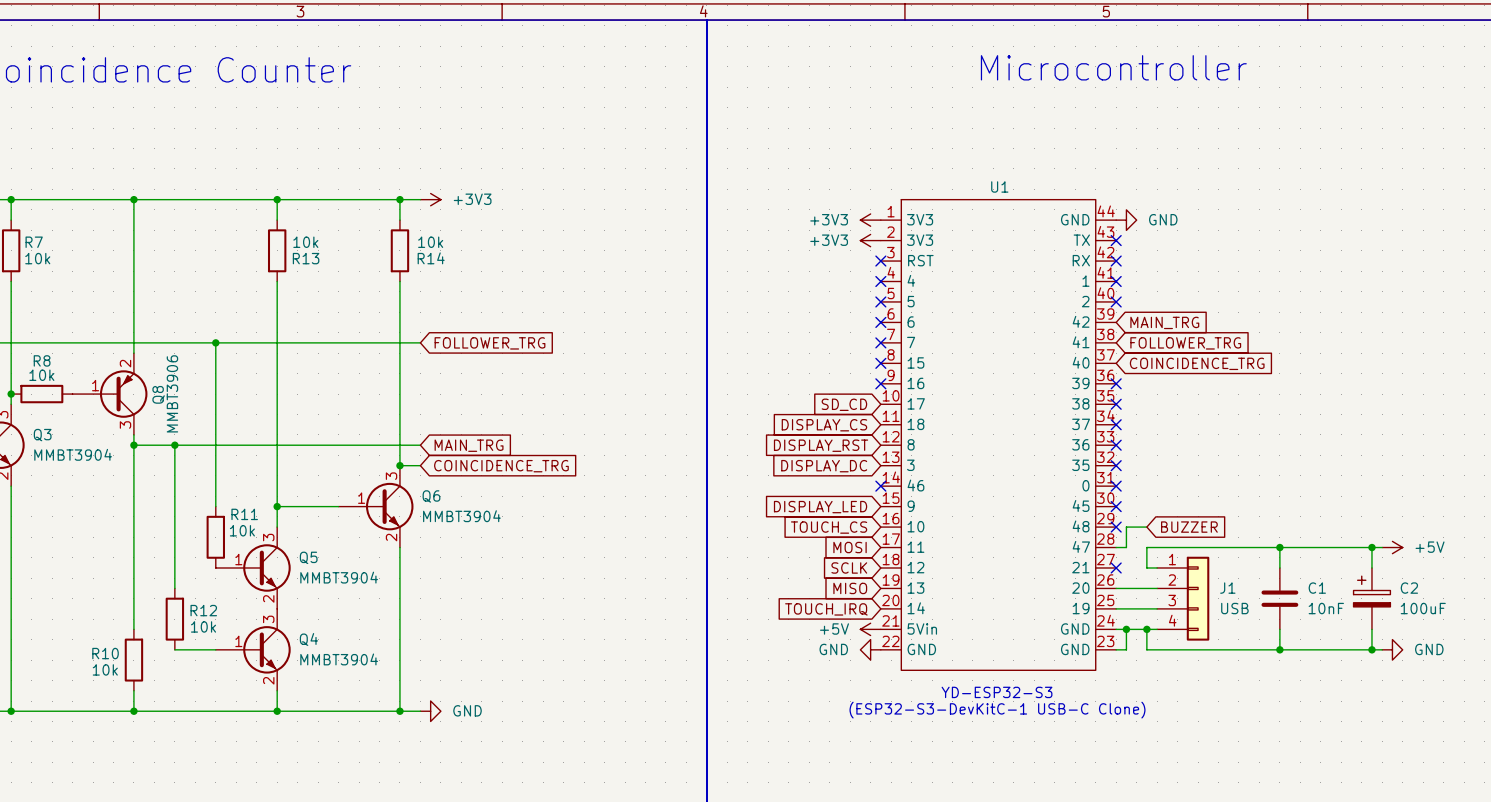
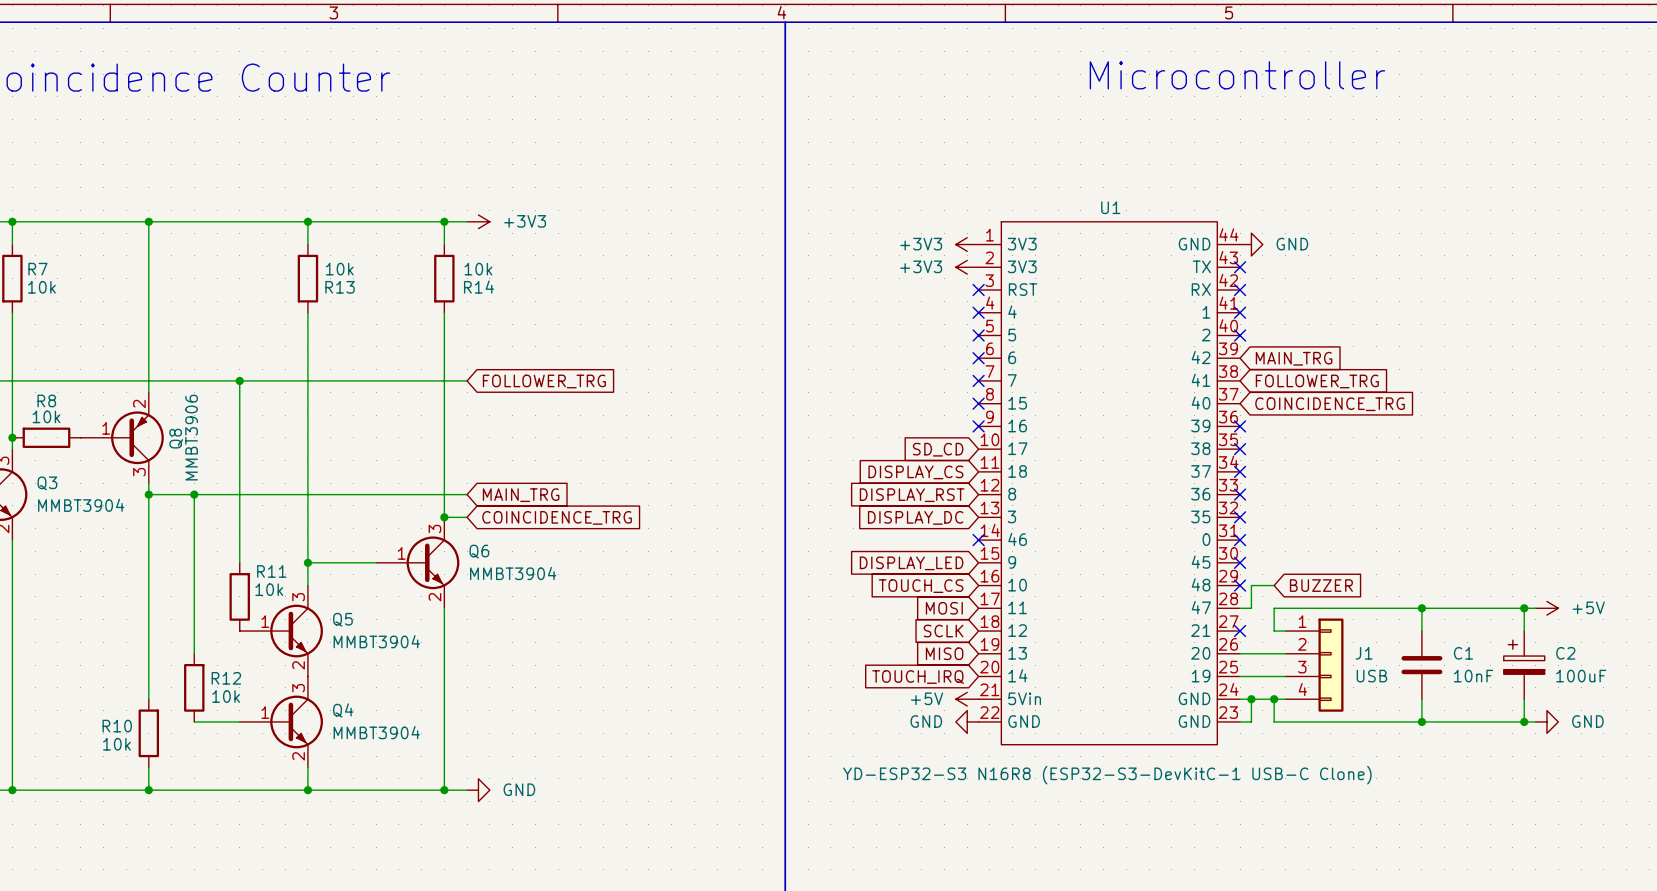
text: YD-ESP32-S3 (997, 692) -> none
U1 value: none -> YD-ESP32-S3 N16R8 (ESP32-S3-DevKitC-1 USB-C Clone) (1107, 775)
text: (ESP32-S3-DevKitC-1 USB-C Clone) (997, 710) -> none

